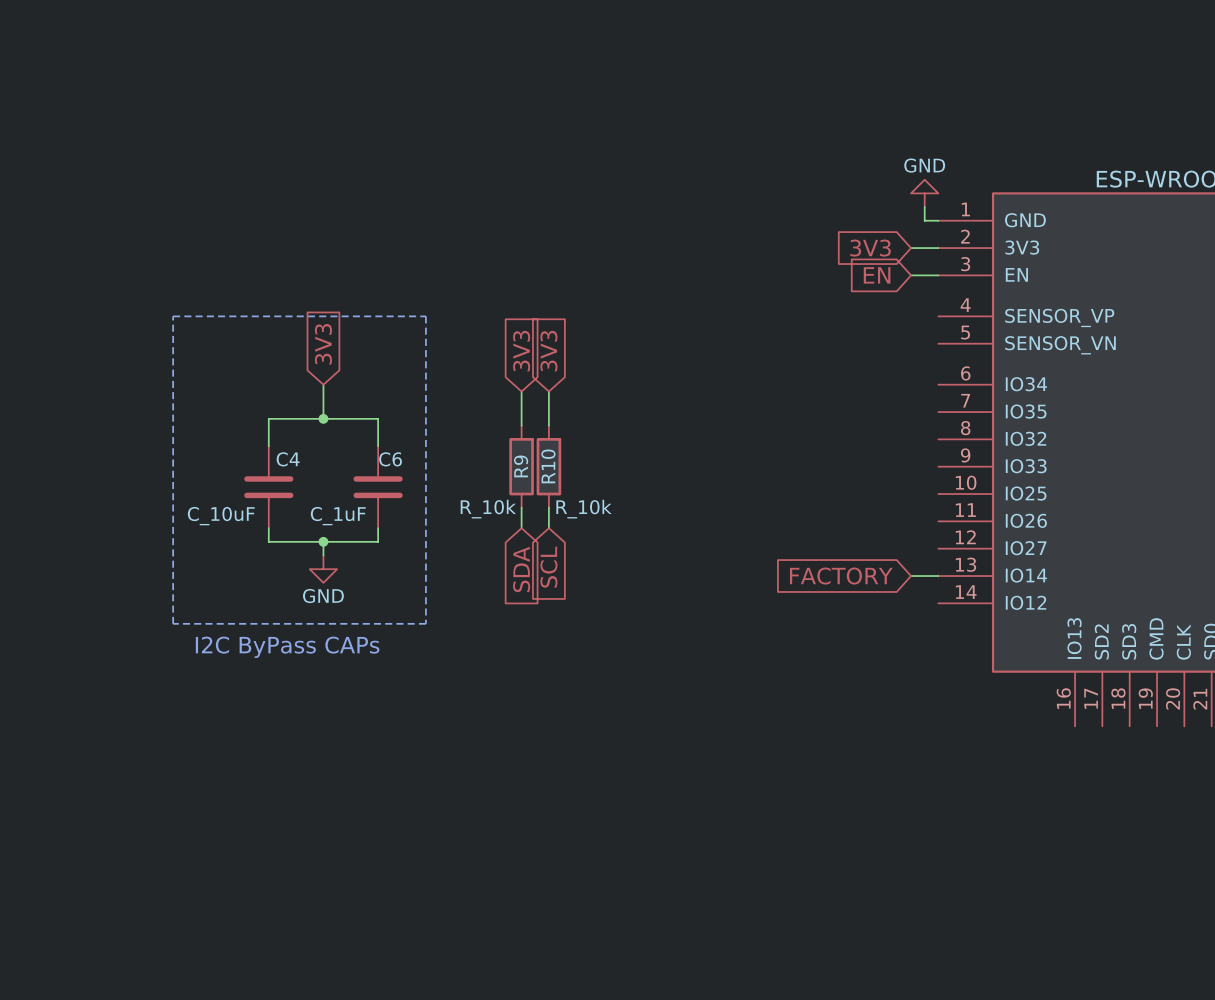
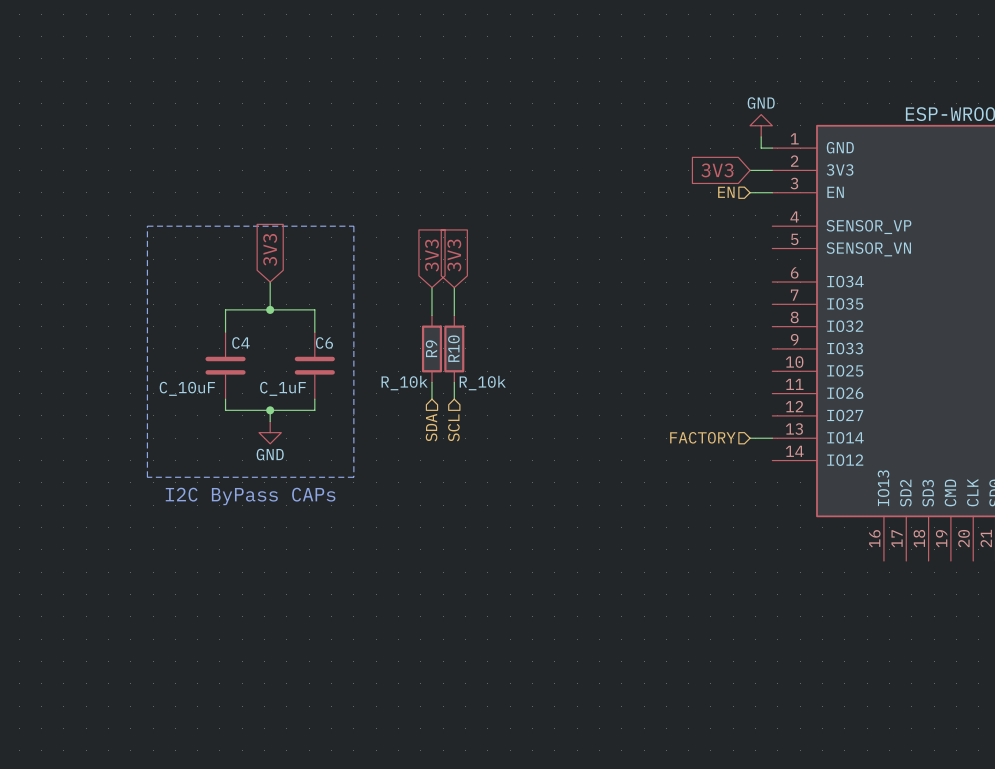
hierarchical label: none -> EN (726, 192)
global label: EN (877, 275) -> none
hierarchical label: none -> SCL (453, 427)
hierarchical label: none -> SDA (431, 427)
global label: SCL (548, 567) -> none
global label: SDA (521, 569) -> none
hierarchical label: none -> FACTORY (702, 437)
global label: FACTORY (841, 576) -> none

